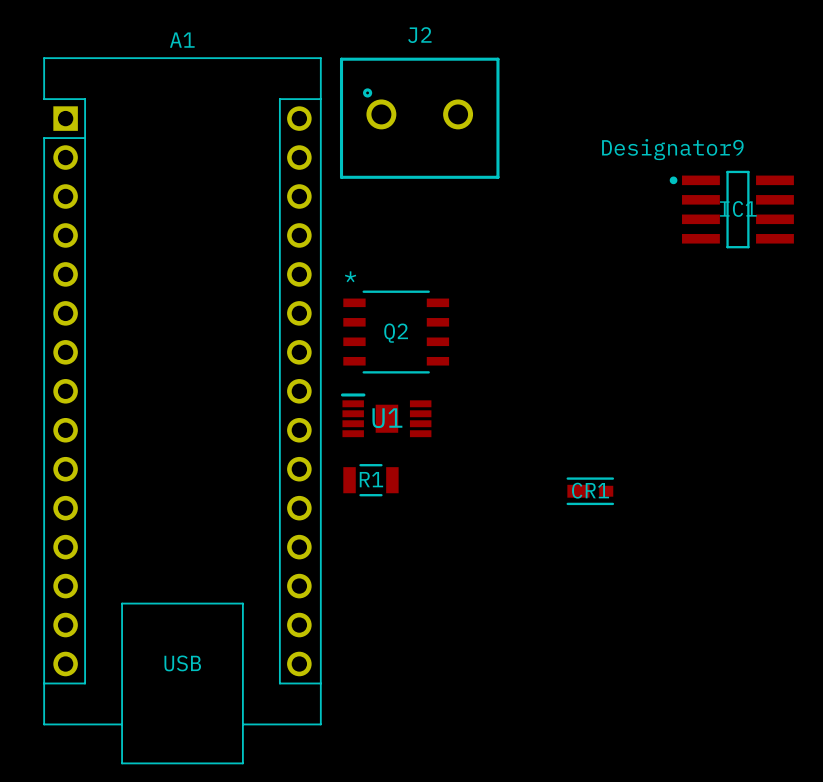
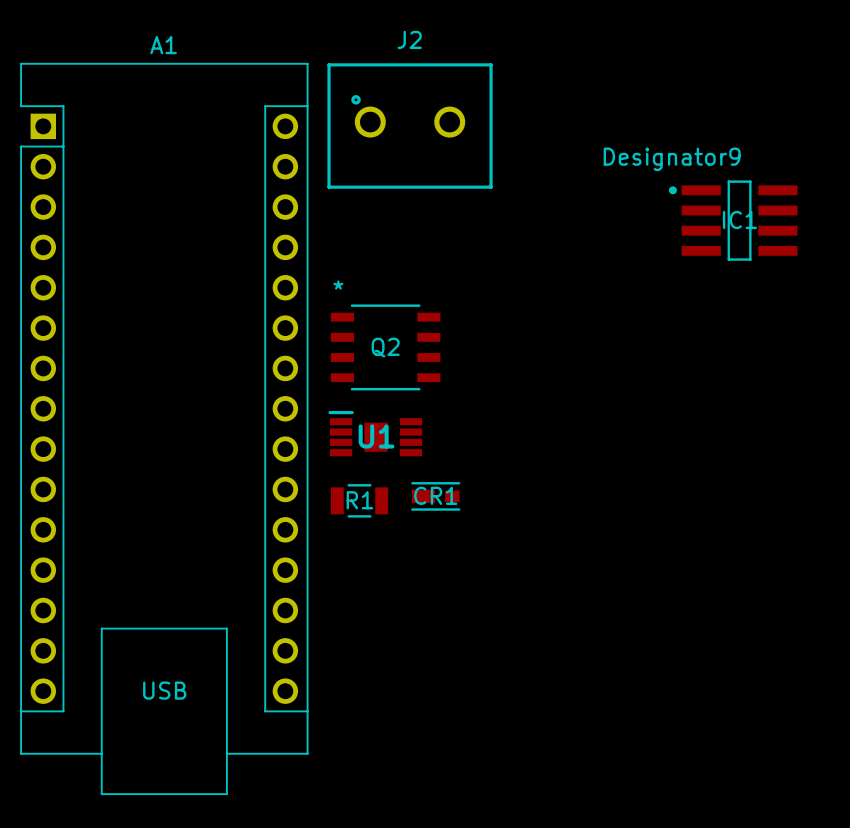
CR1 position: (590, 491) -> (435, 496)

